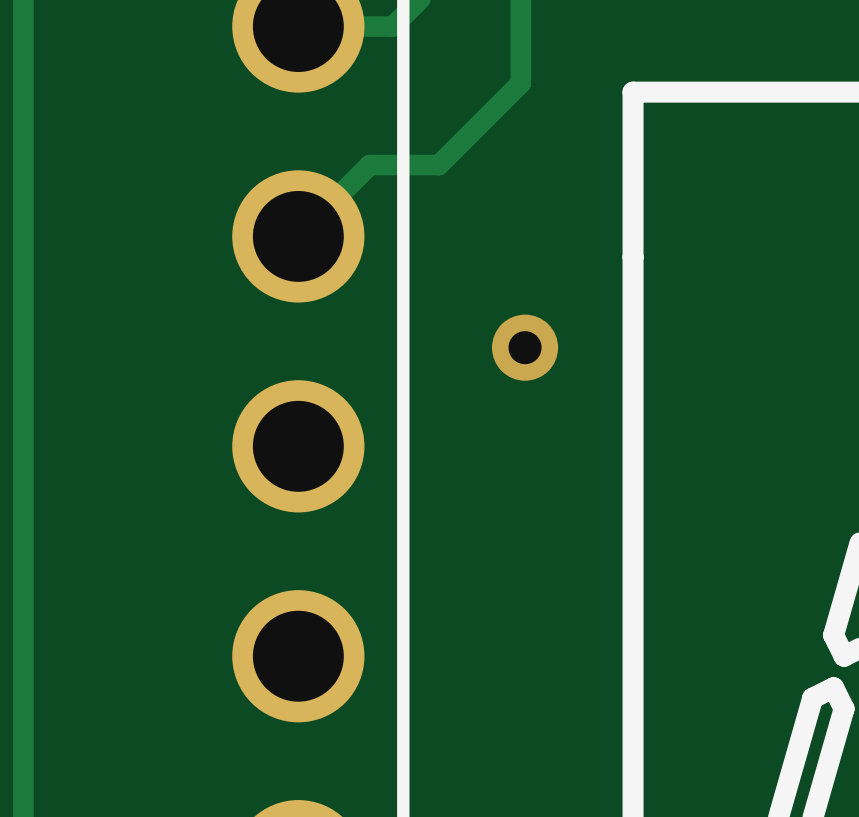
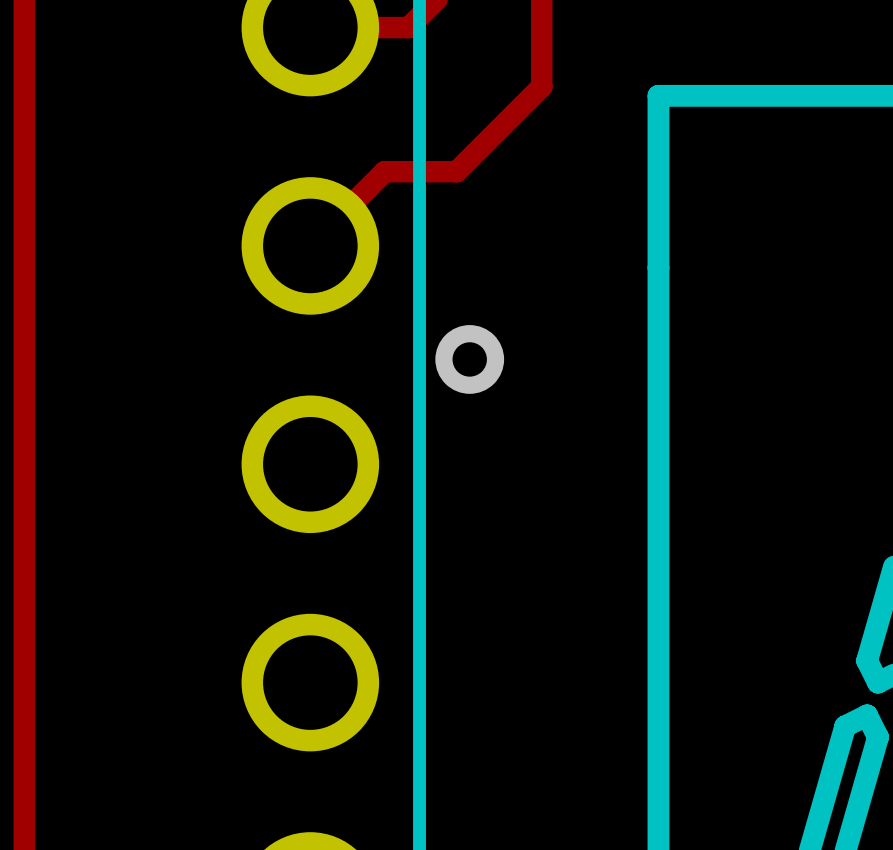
via position: (525, 347) -> (469, 359)

